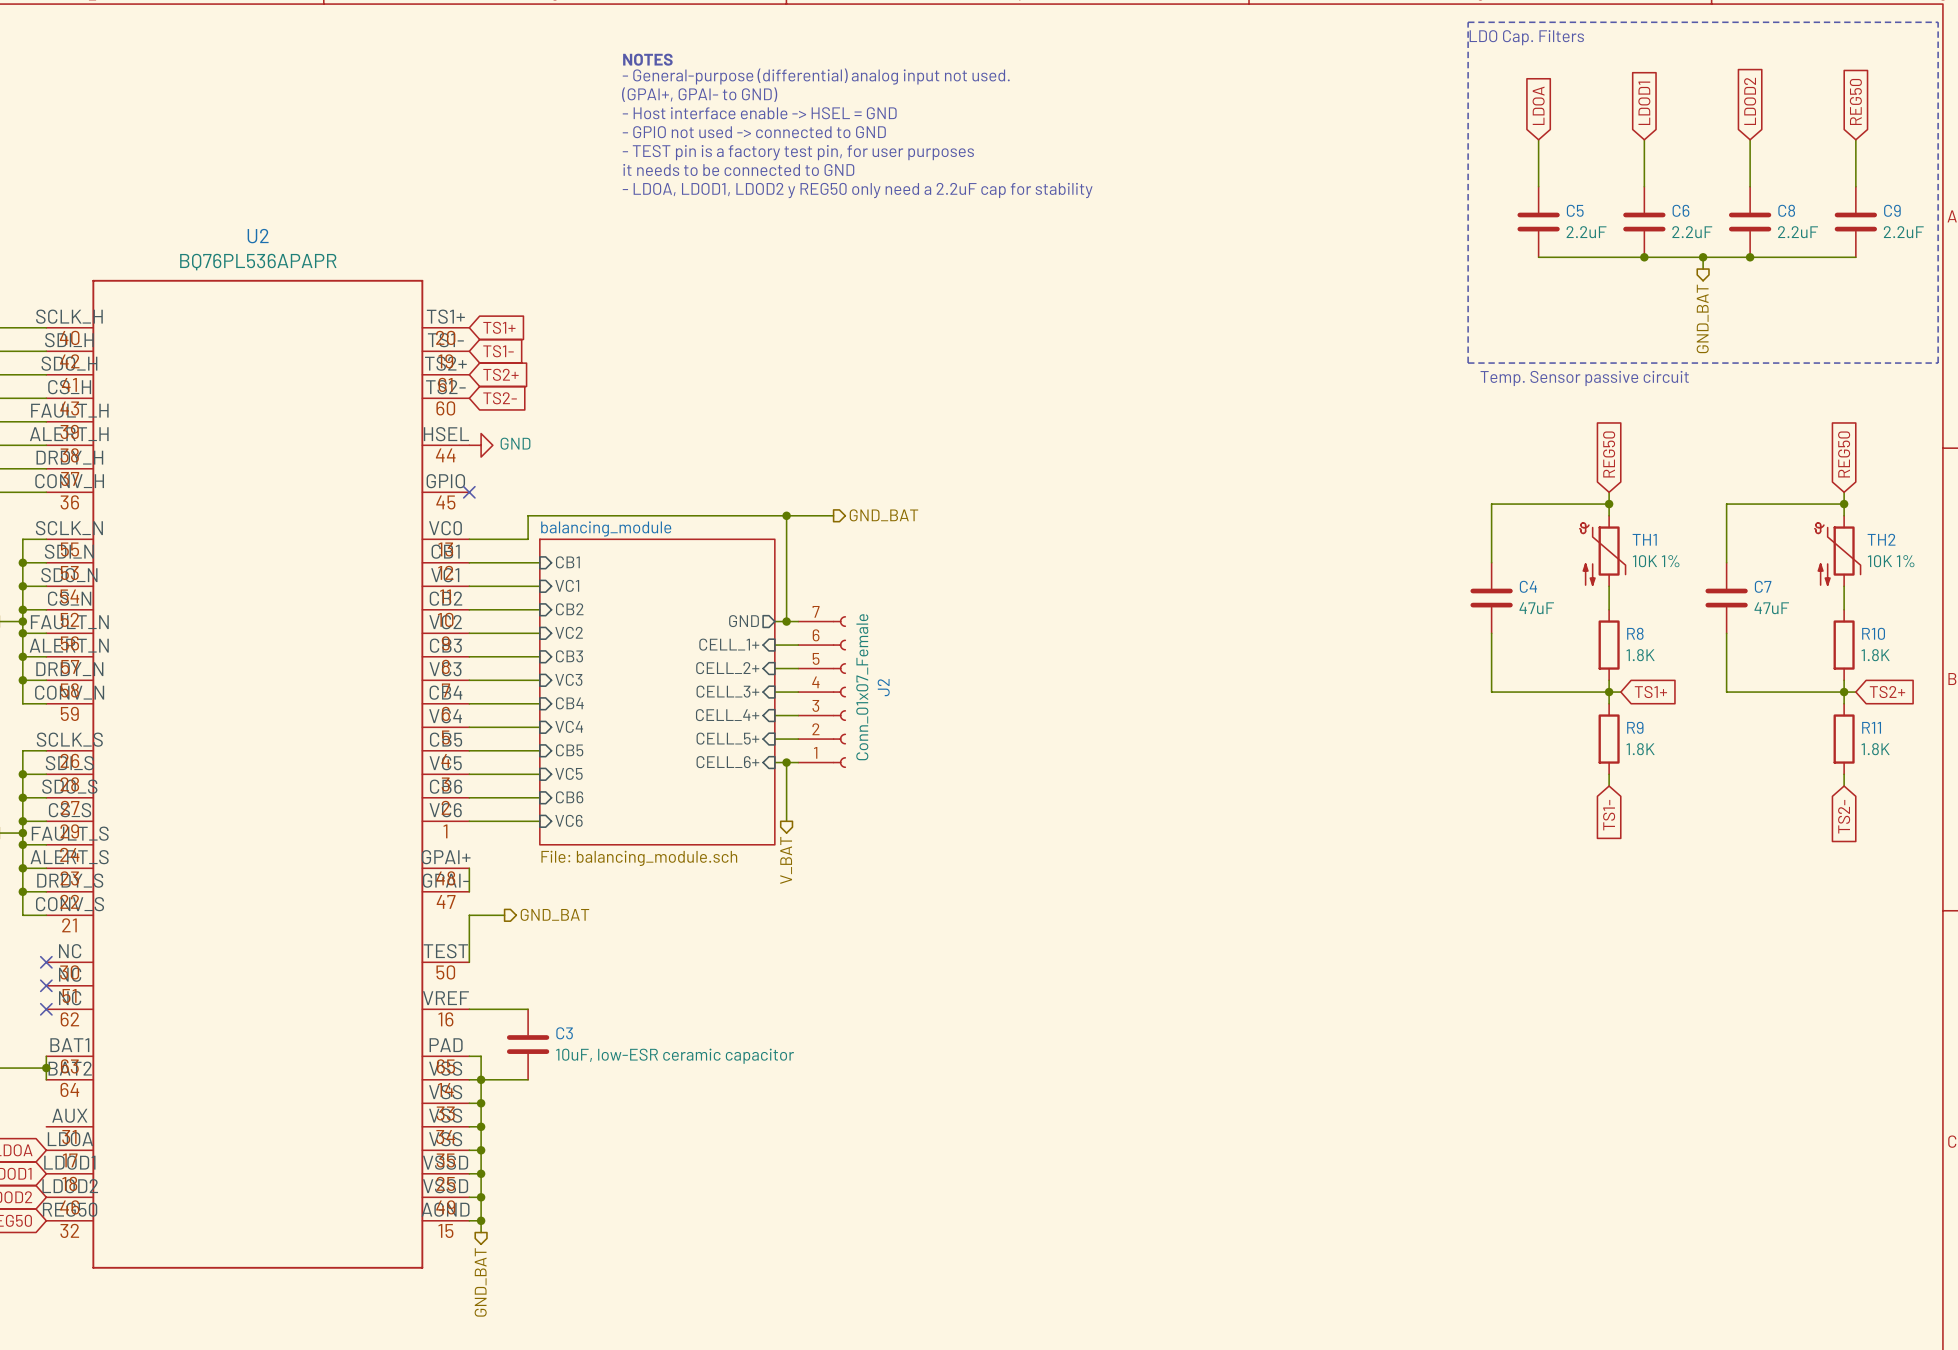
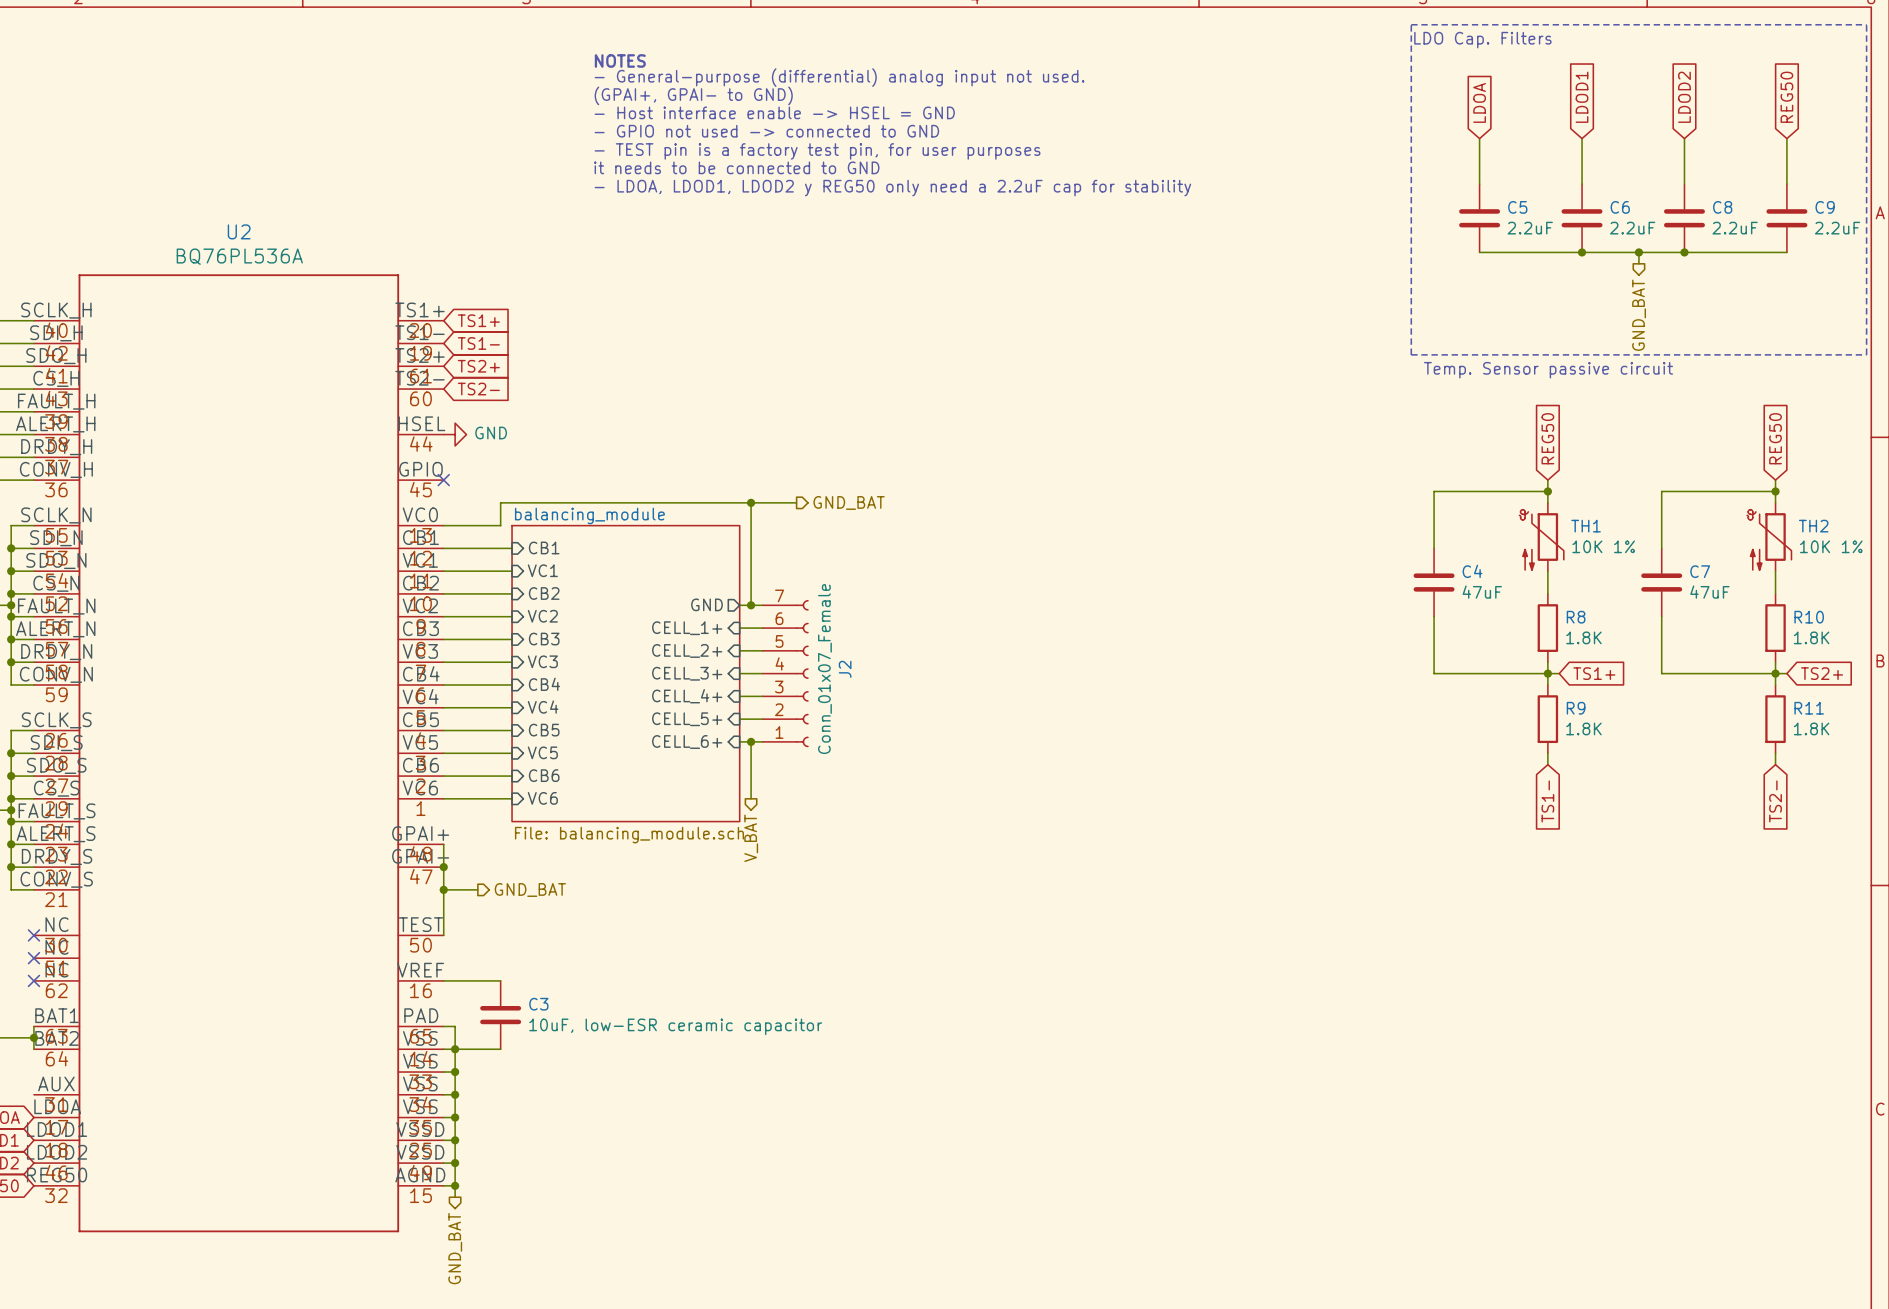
U2 value: BQ76PL536APAPR (258, 262) -> BQ76PL536A (239, 256)
wire: none -> (443, 867) (443, 889)
junction: none -> (443, 867)
junction: none -> (443, 889)

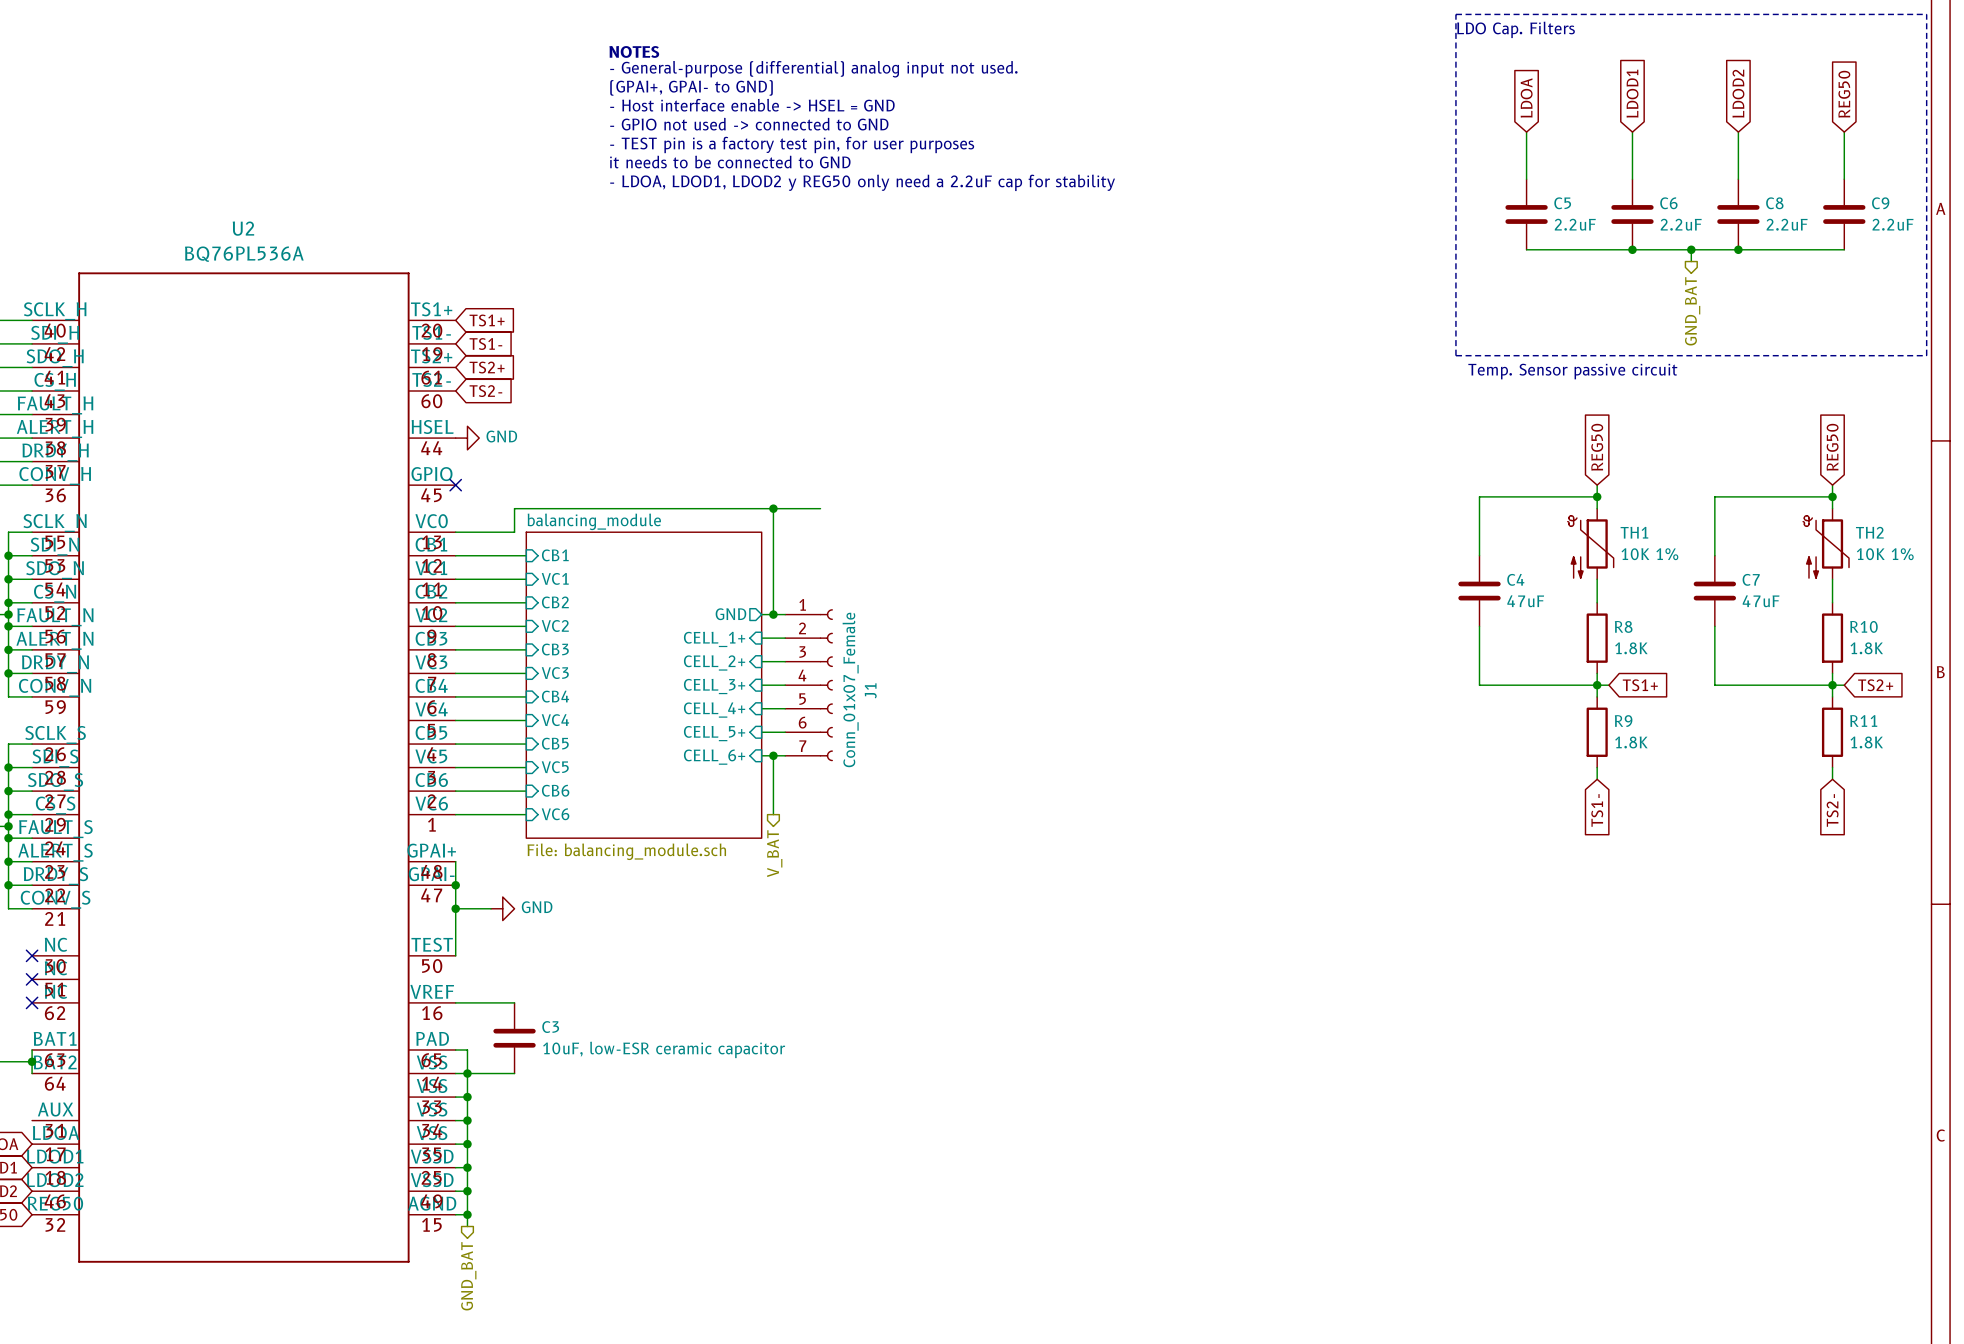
hierarchical label: GND_BAT (849, 502) -> none
J2 name: J2 (845, 669) -> J1 (870, 690)
J2 flip: as is (802, 673) -> up-down (826, 685)
power symbol: none -> GND (502, 908)
hierarchical label: GND_BAT (530, 890) -> none

